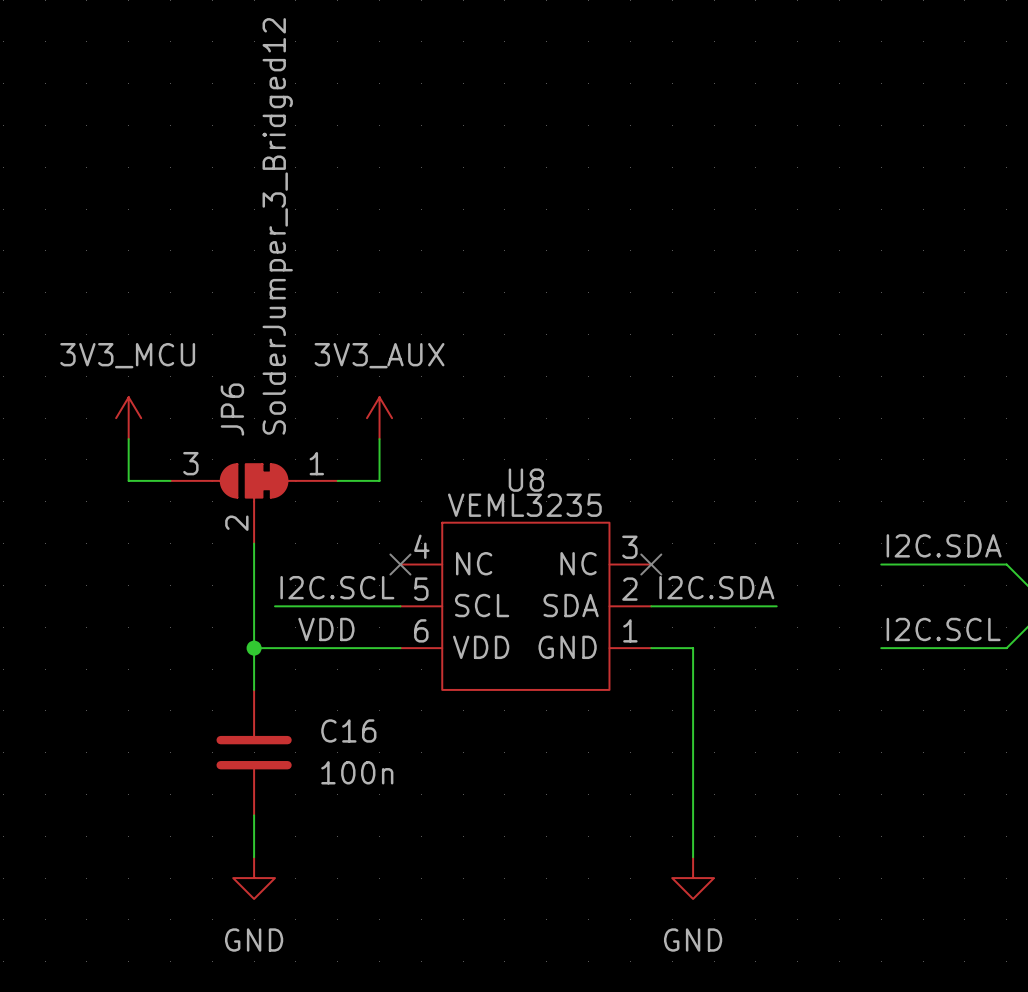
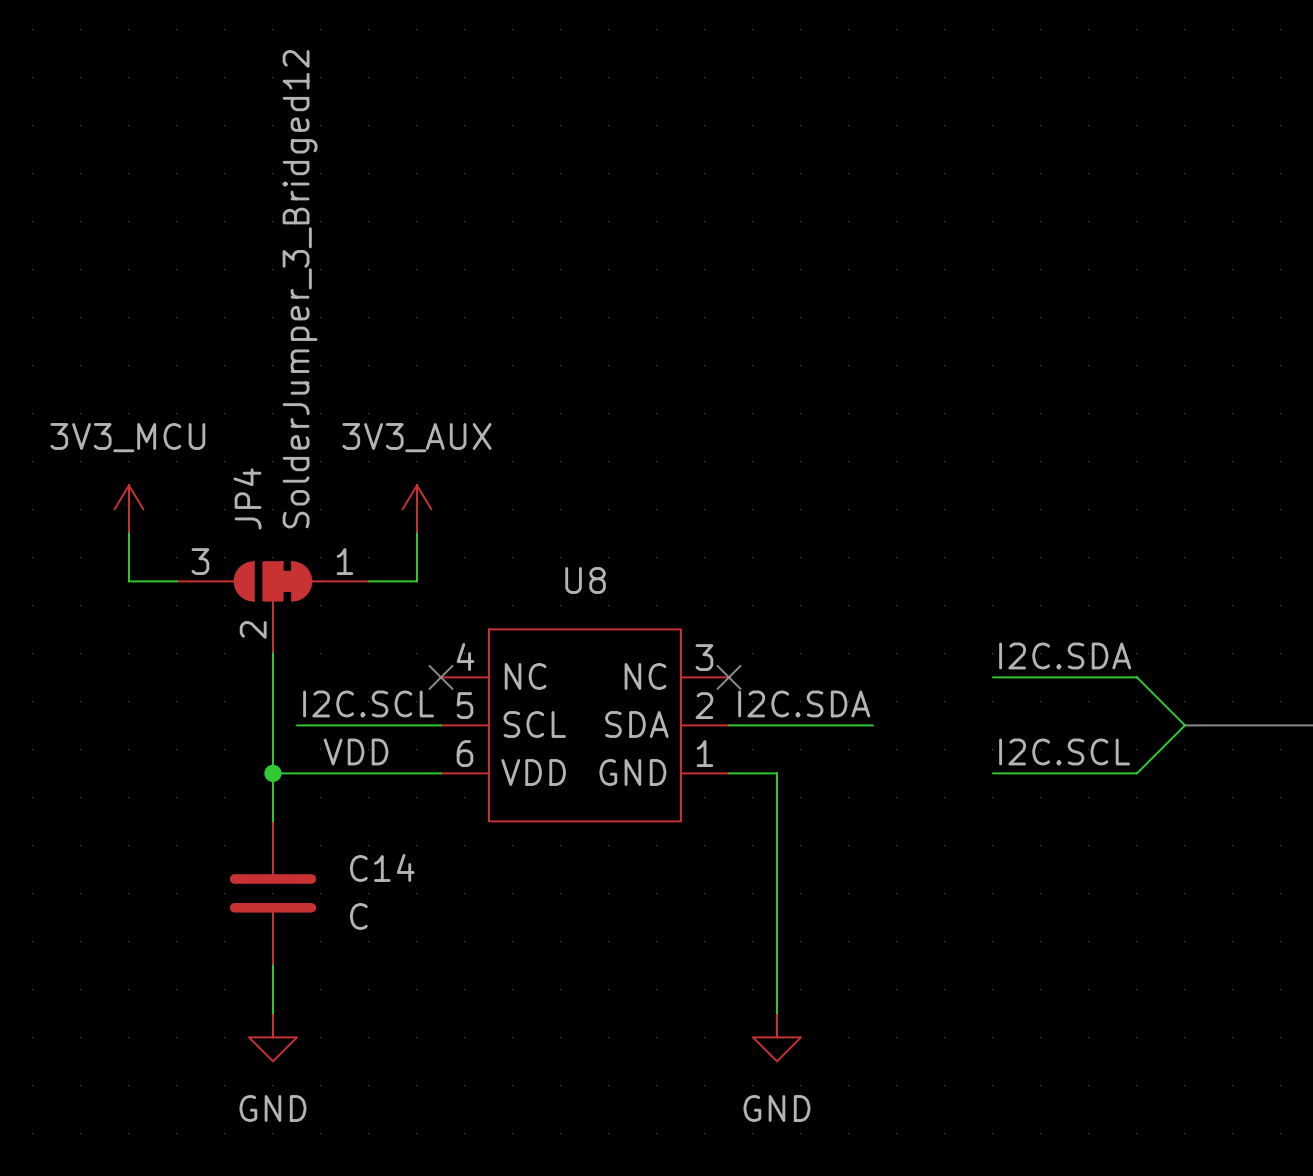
JP6 name: JP6 (232, 409) -> JP4 (247, 498)
U8 value: VEML3235 (524, 505) -> none
C16 name: C16 (348, 730) -> C14 (382, 867)
C16 value: 100n (357, 772) -> C (358, 916)

